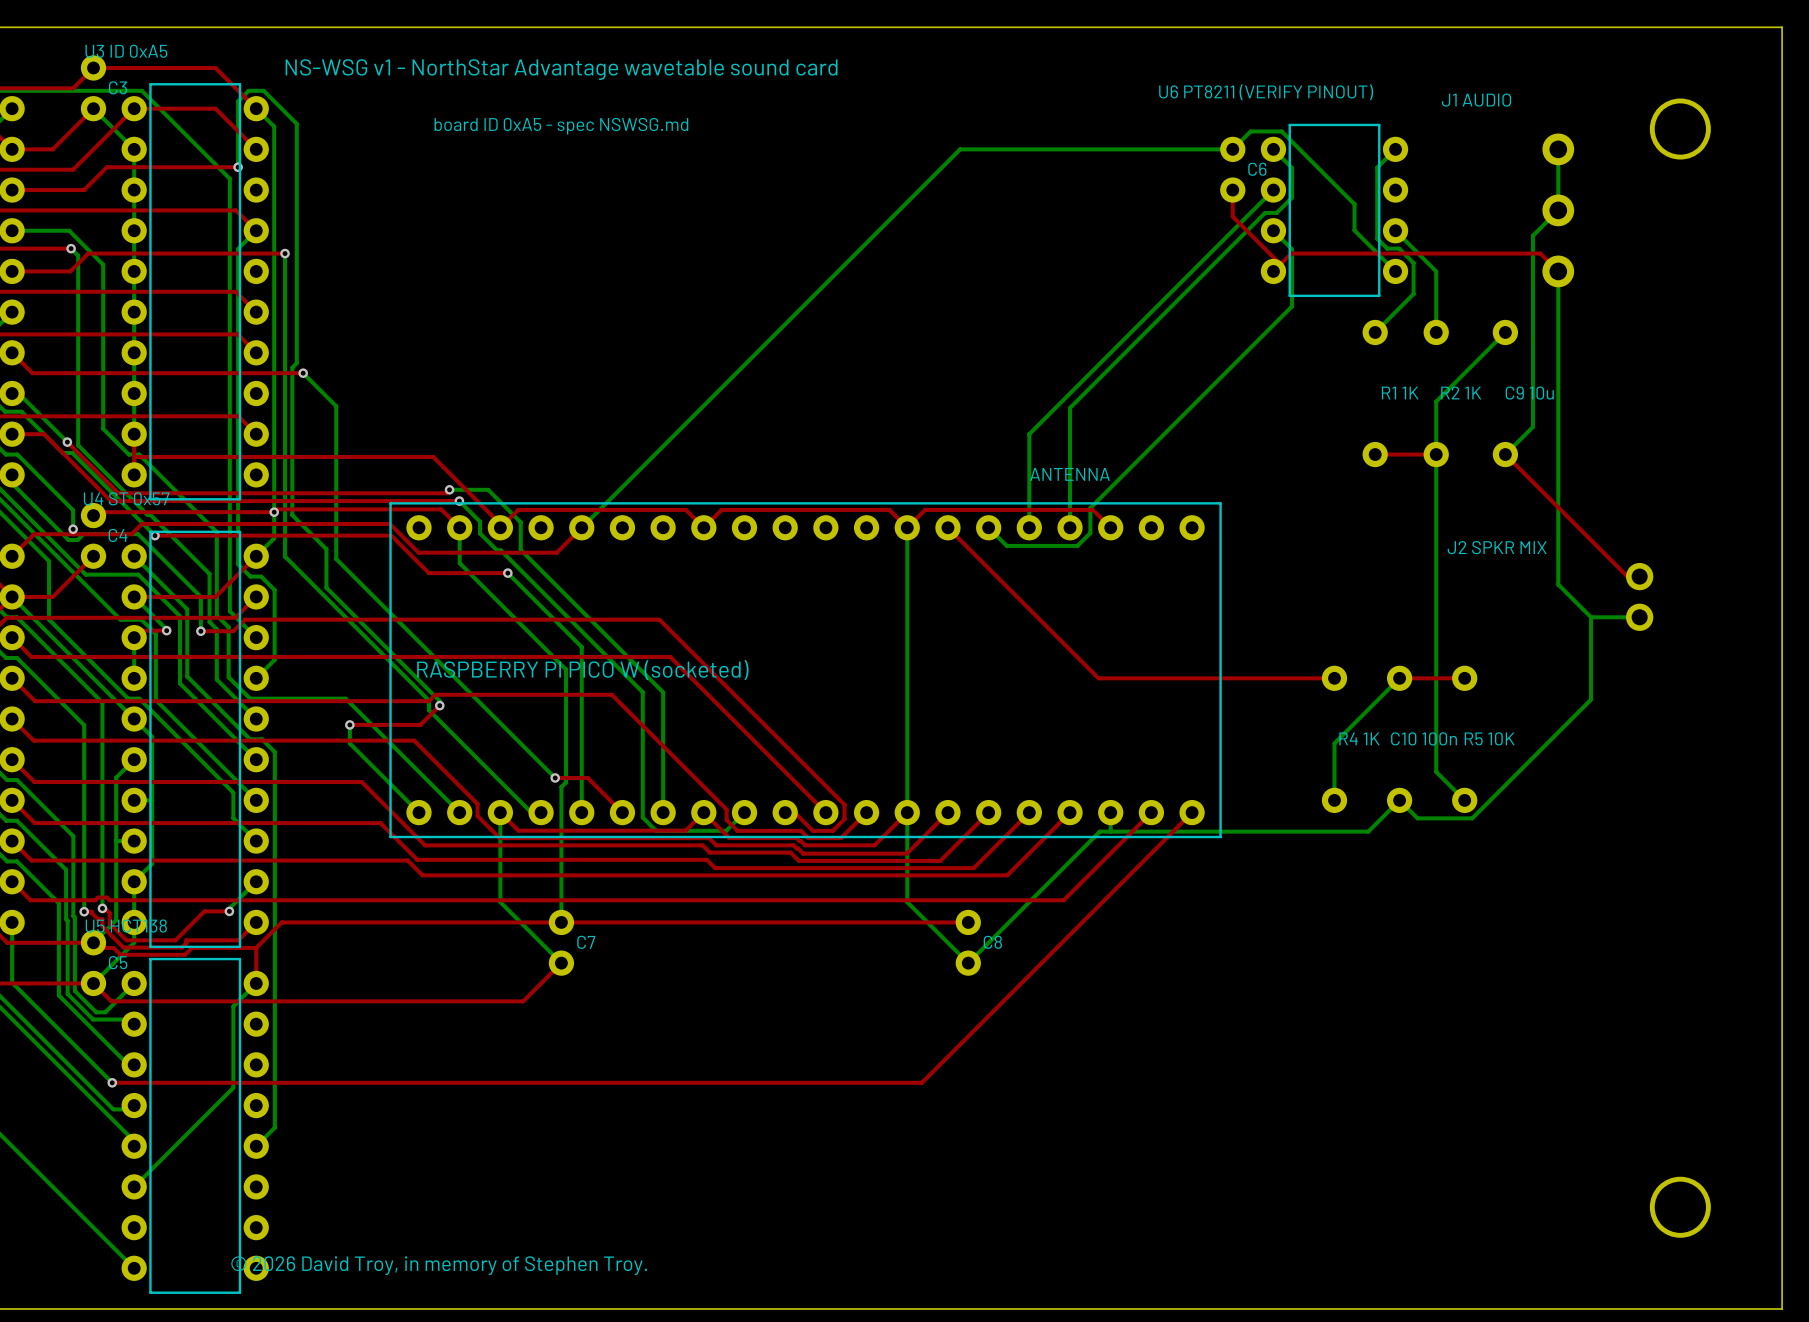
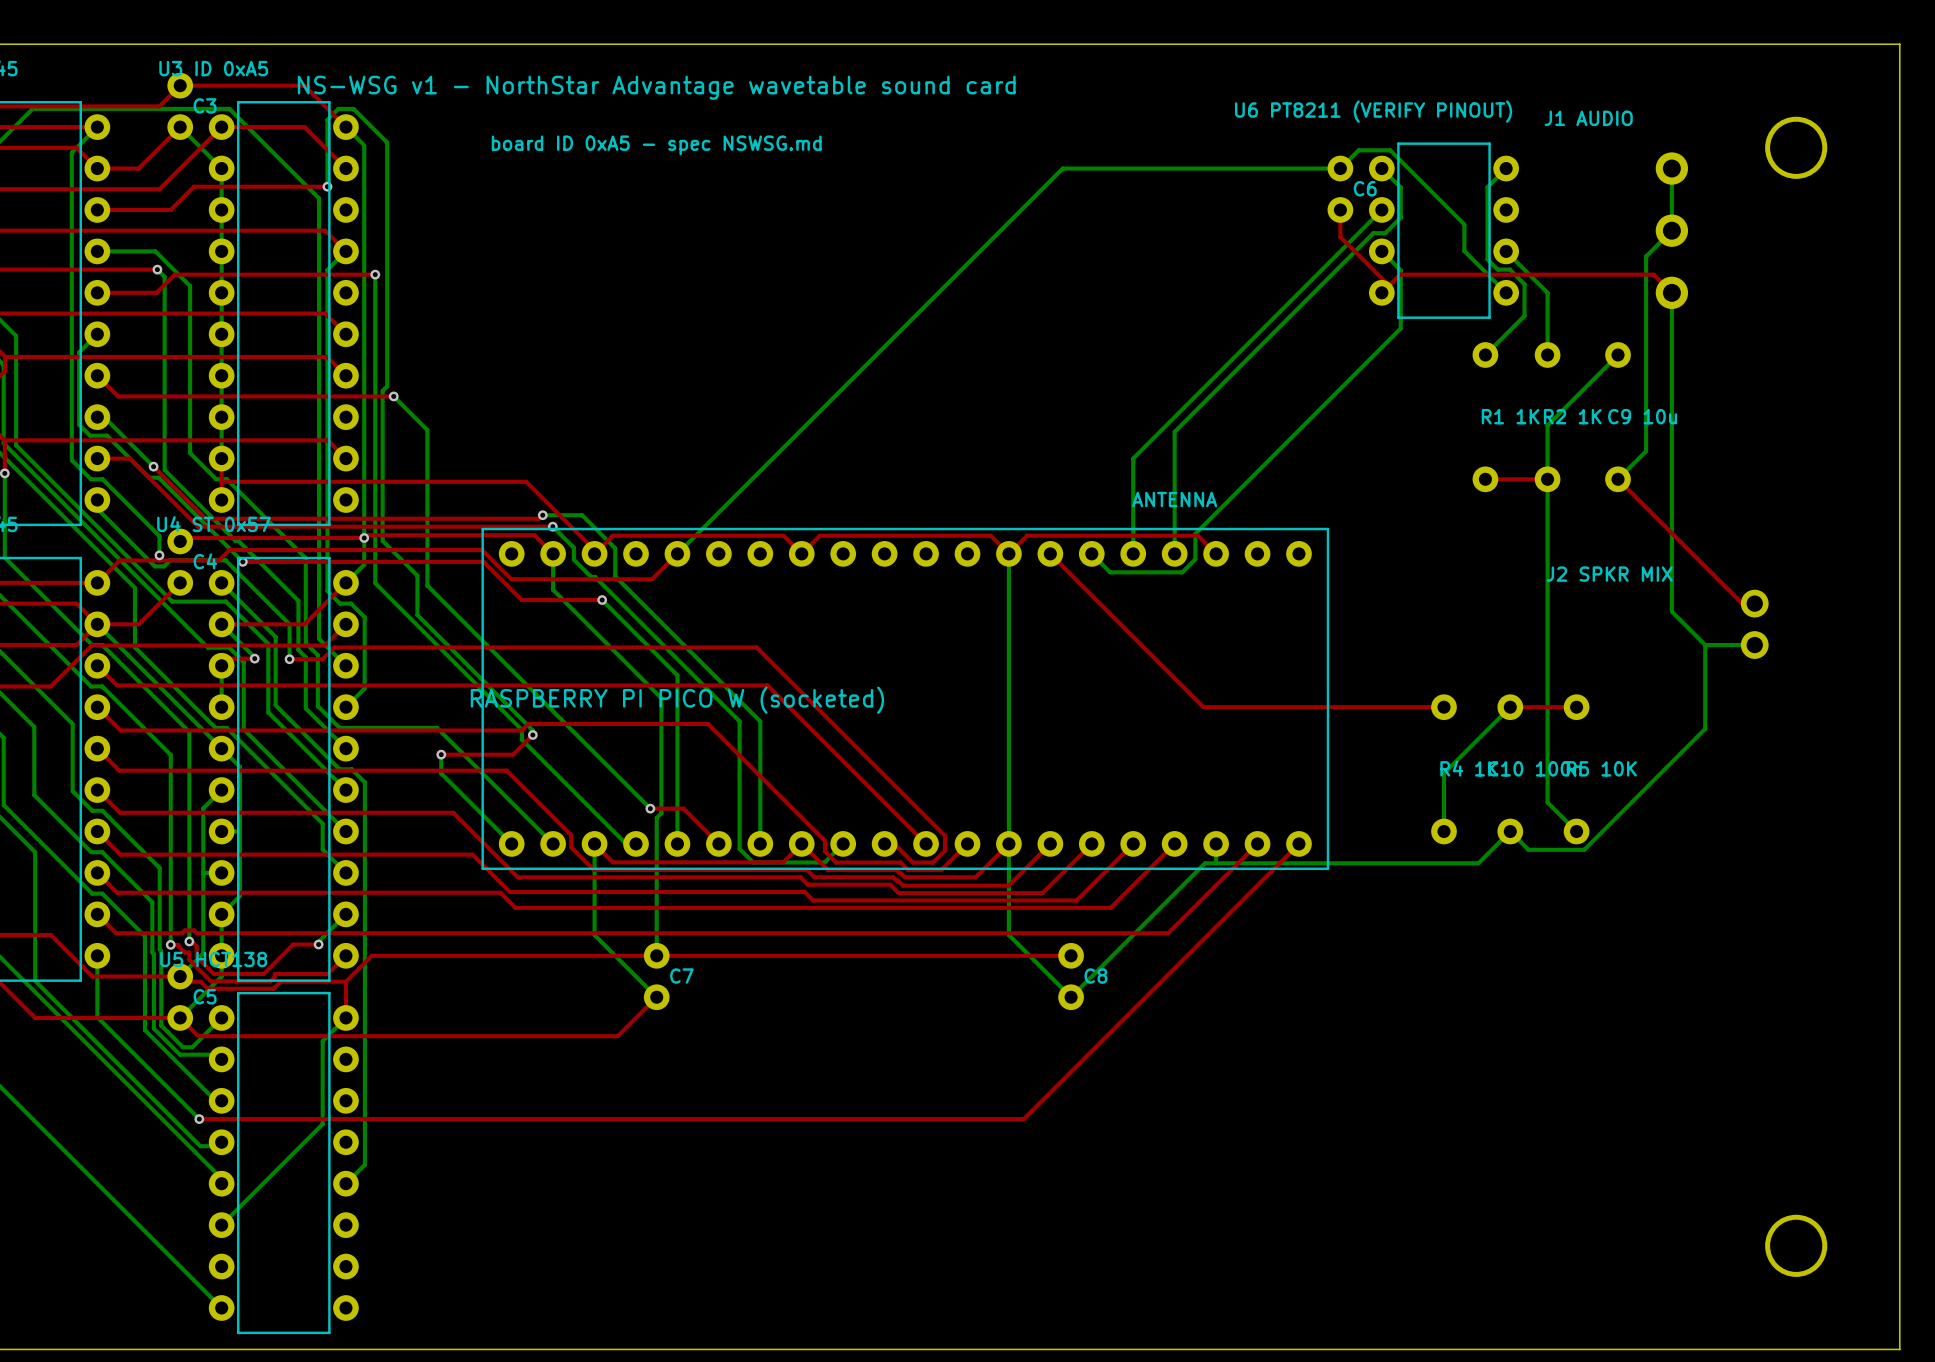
text: © 2026 David Troy, in memory of Stephen Troy. (439, 1265) -> none

